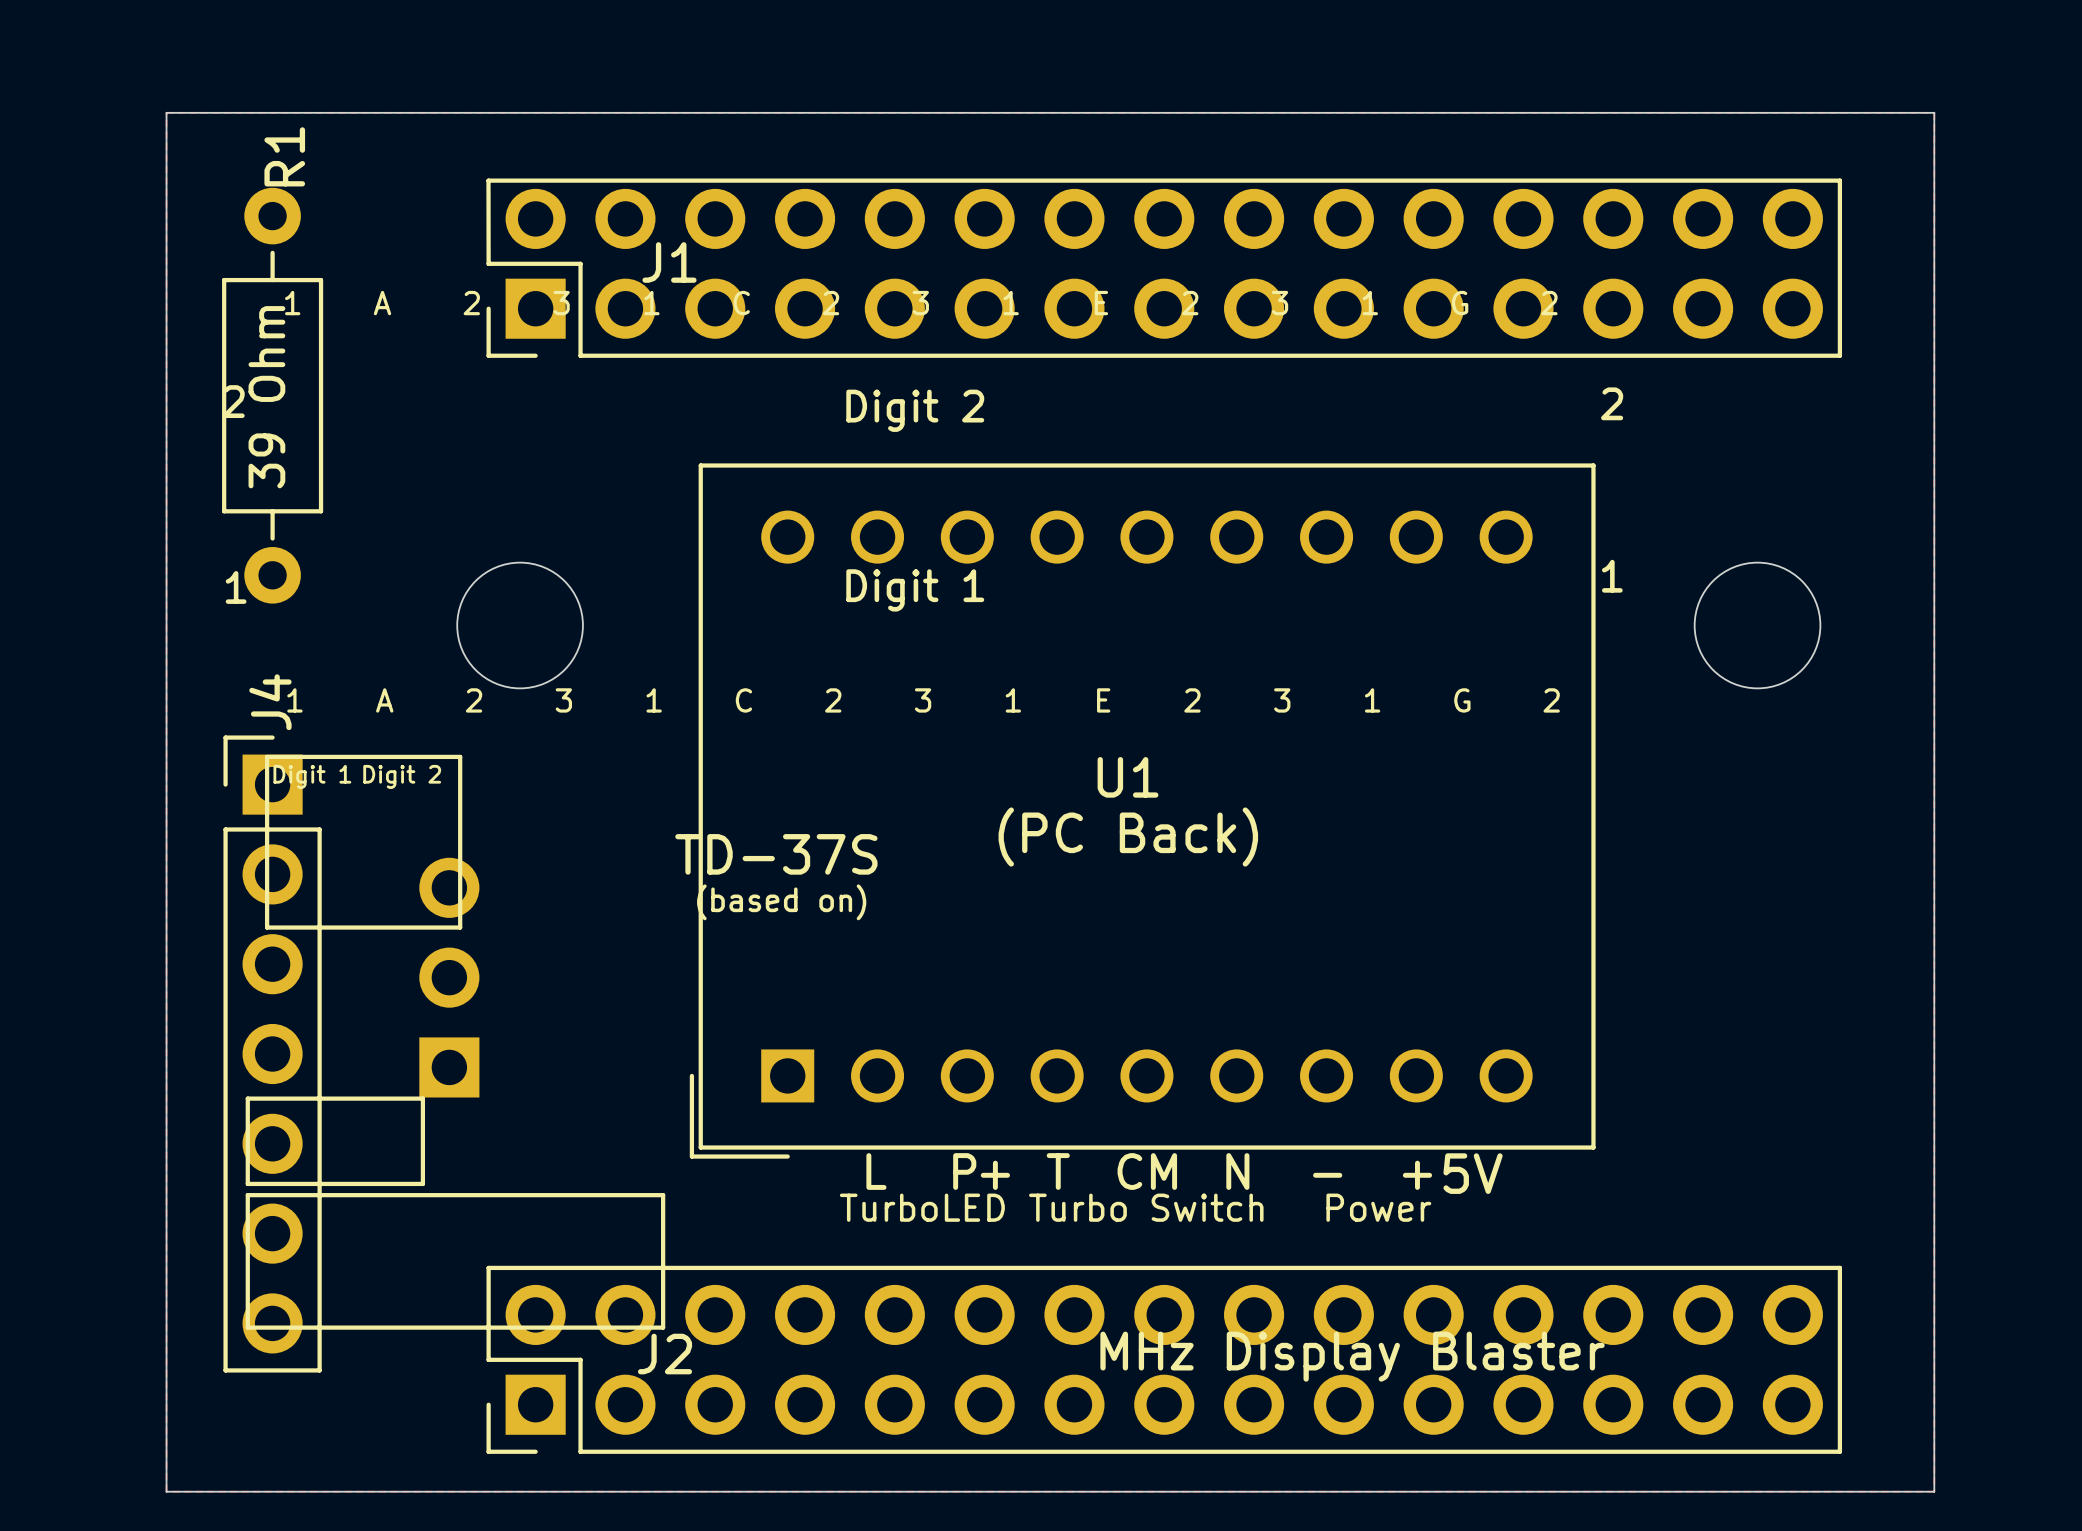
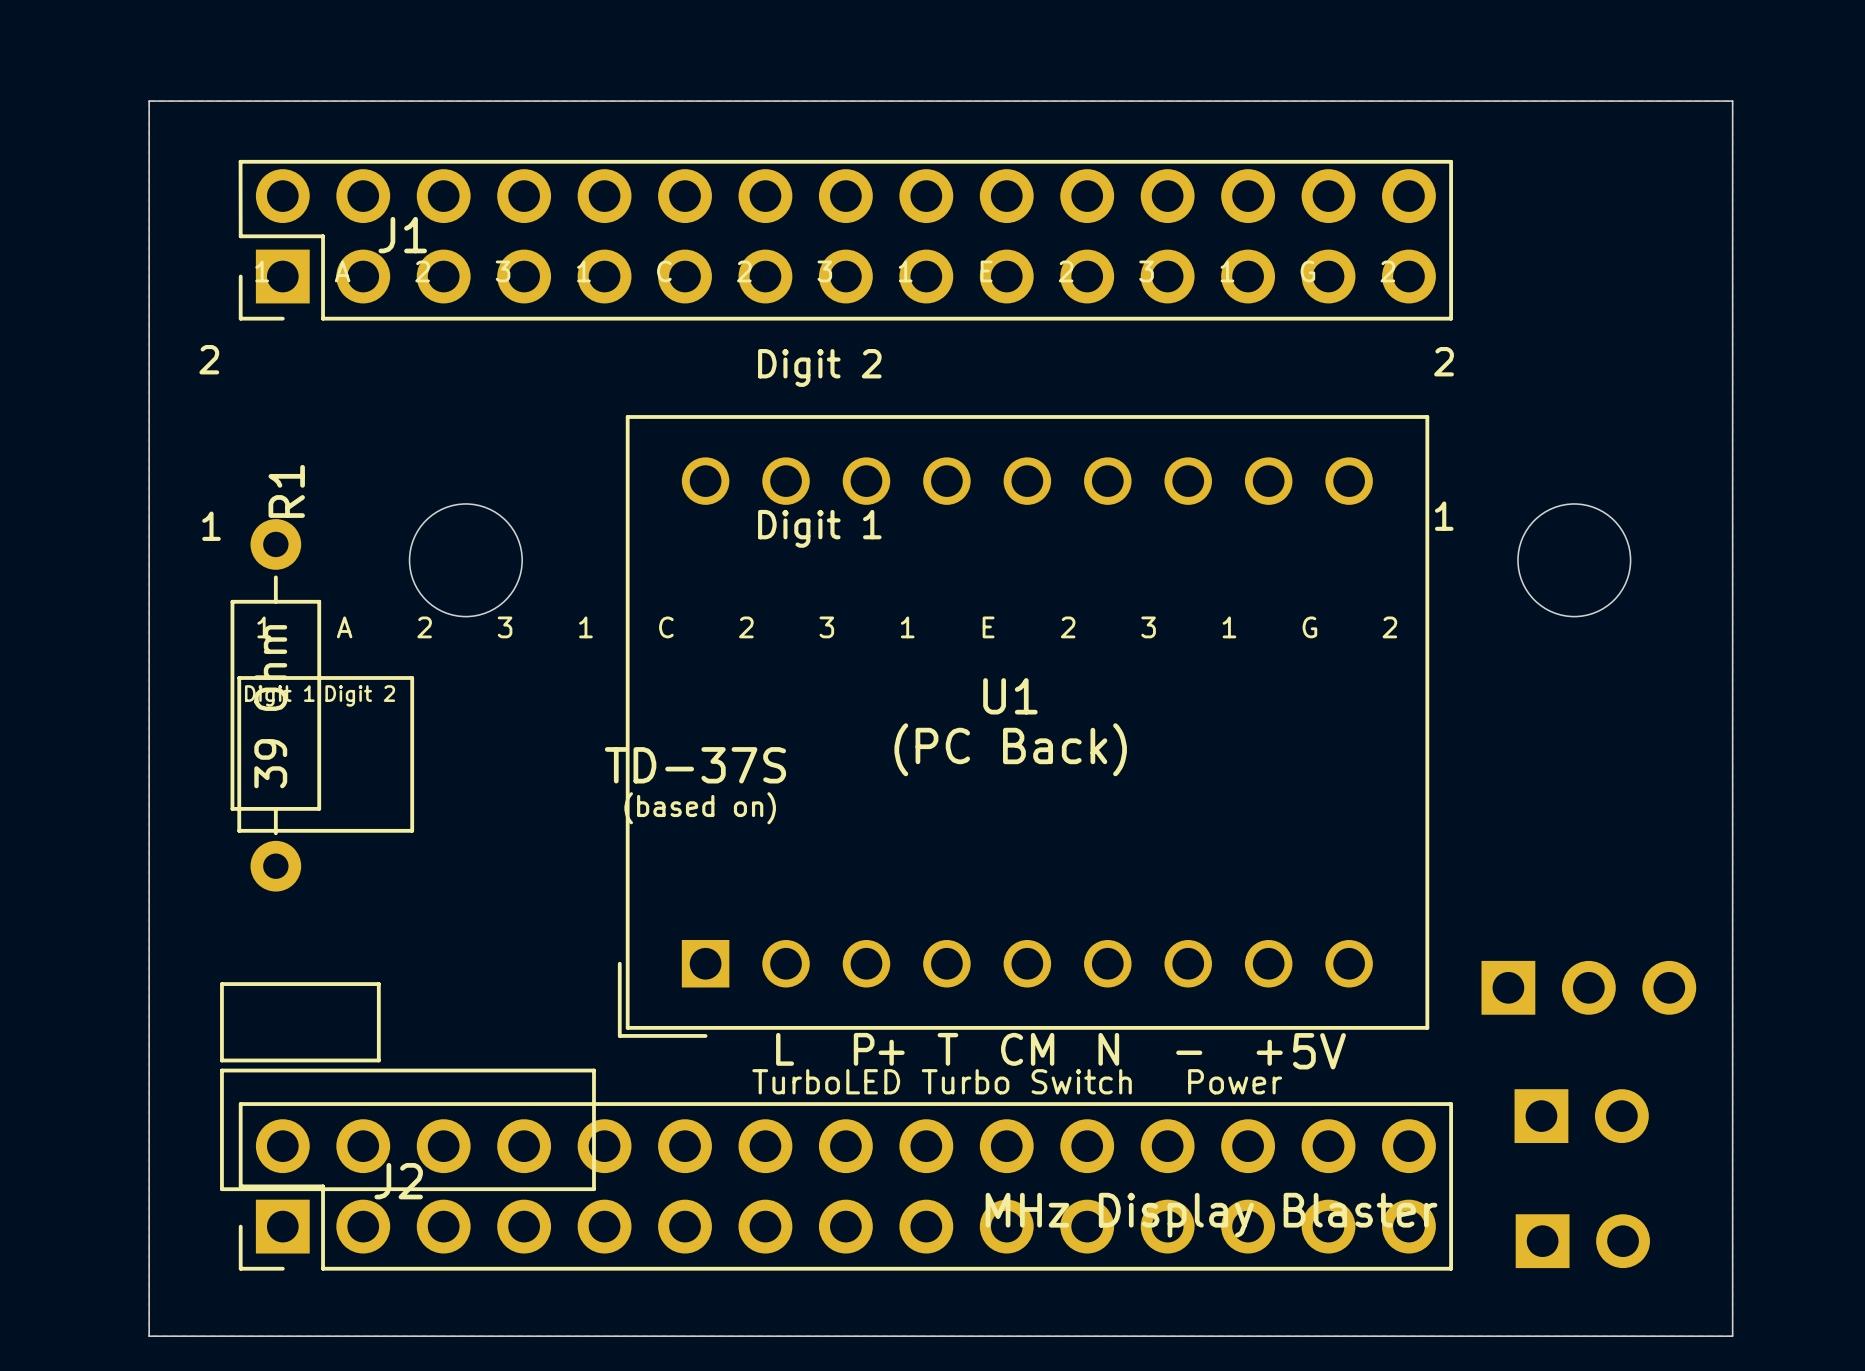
J1 position: (1164, 268) -> (845, 240)
R1 position: (272, 395) -> (275, 705)
part: (449, 977) -> none
J4: (272, 1054) -> none
part: none -> (1588, 987)
part: none -> (1581, 1116)
J2 position: (1164, 1359) -> (845, 1186)
part: none -> (1582, 1241)

